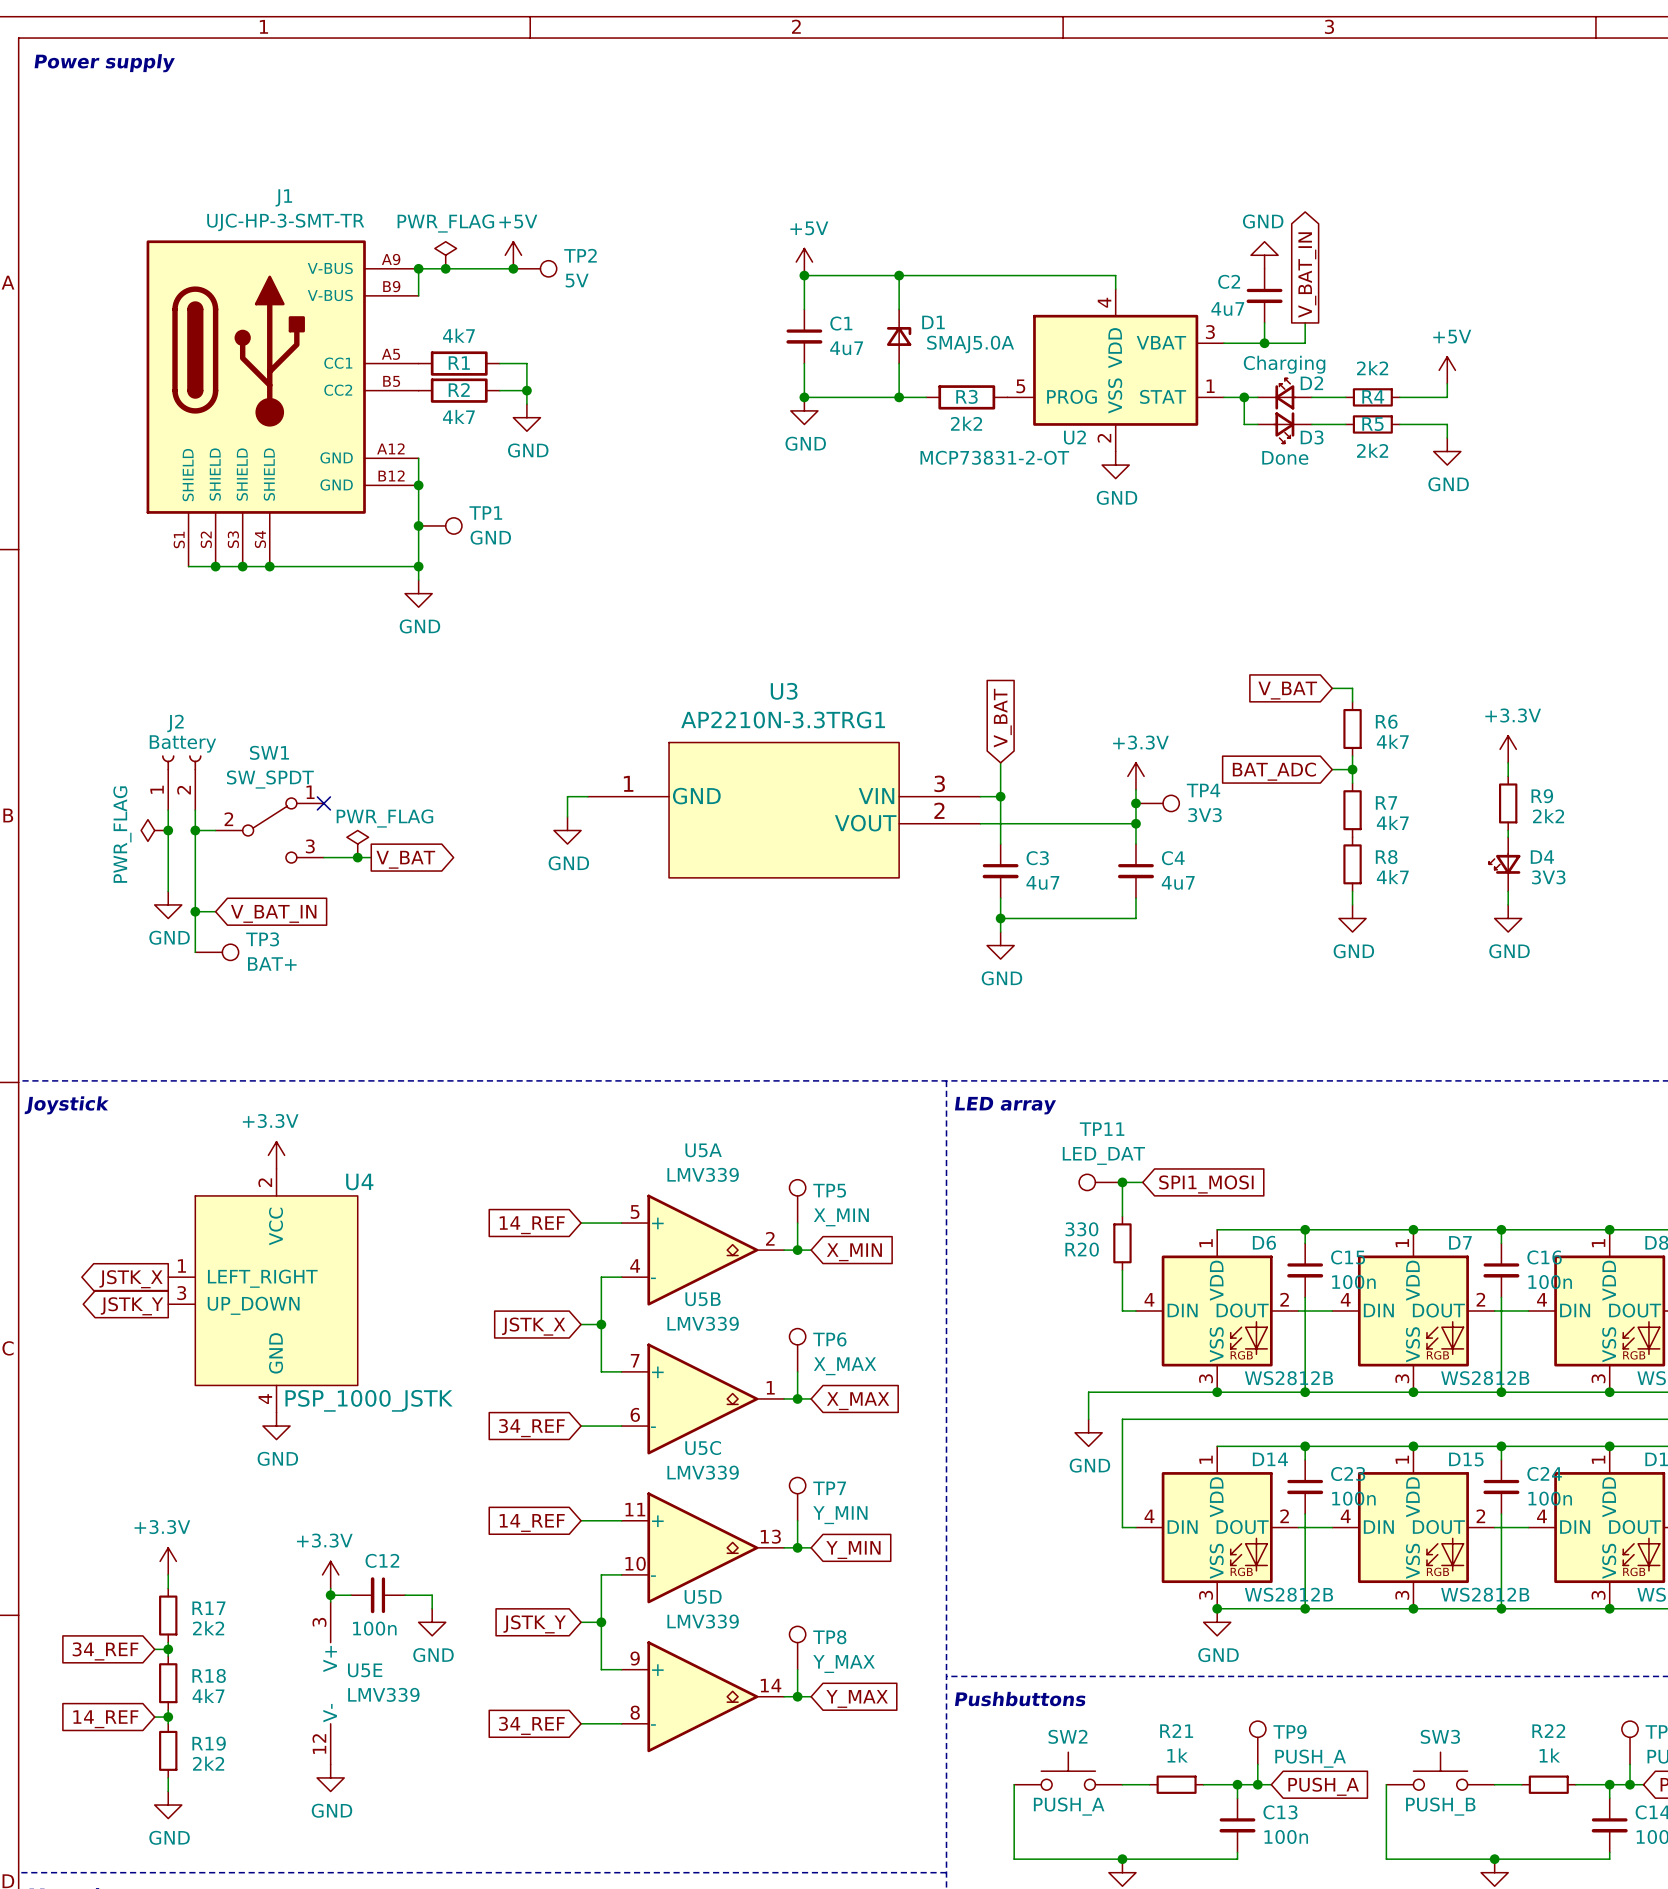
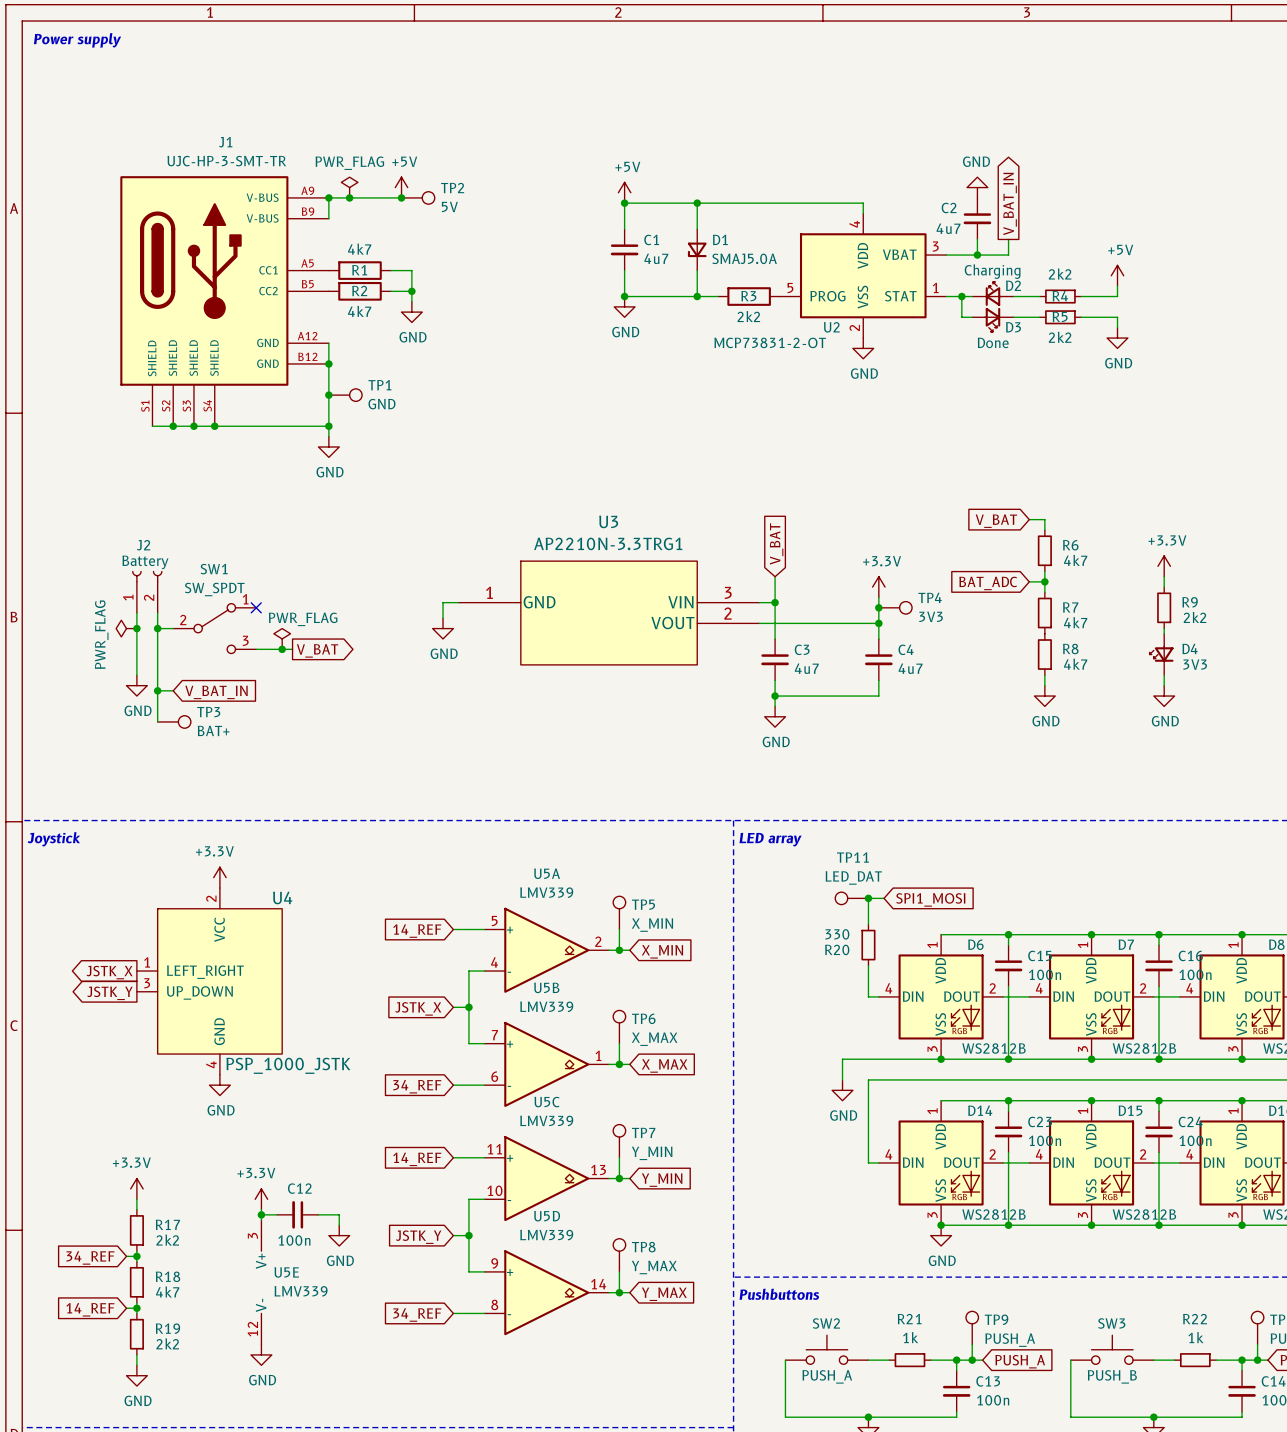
D1 rotation: 0° (899, 336) -> 180° (697, 249)

